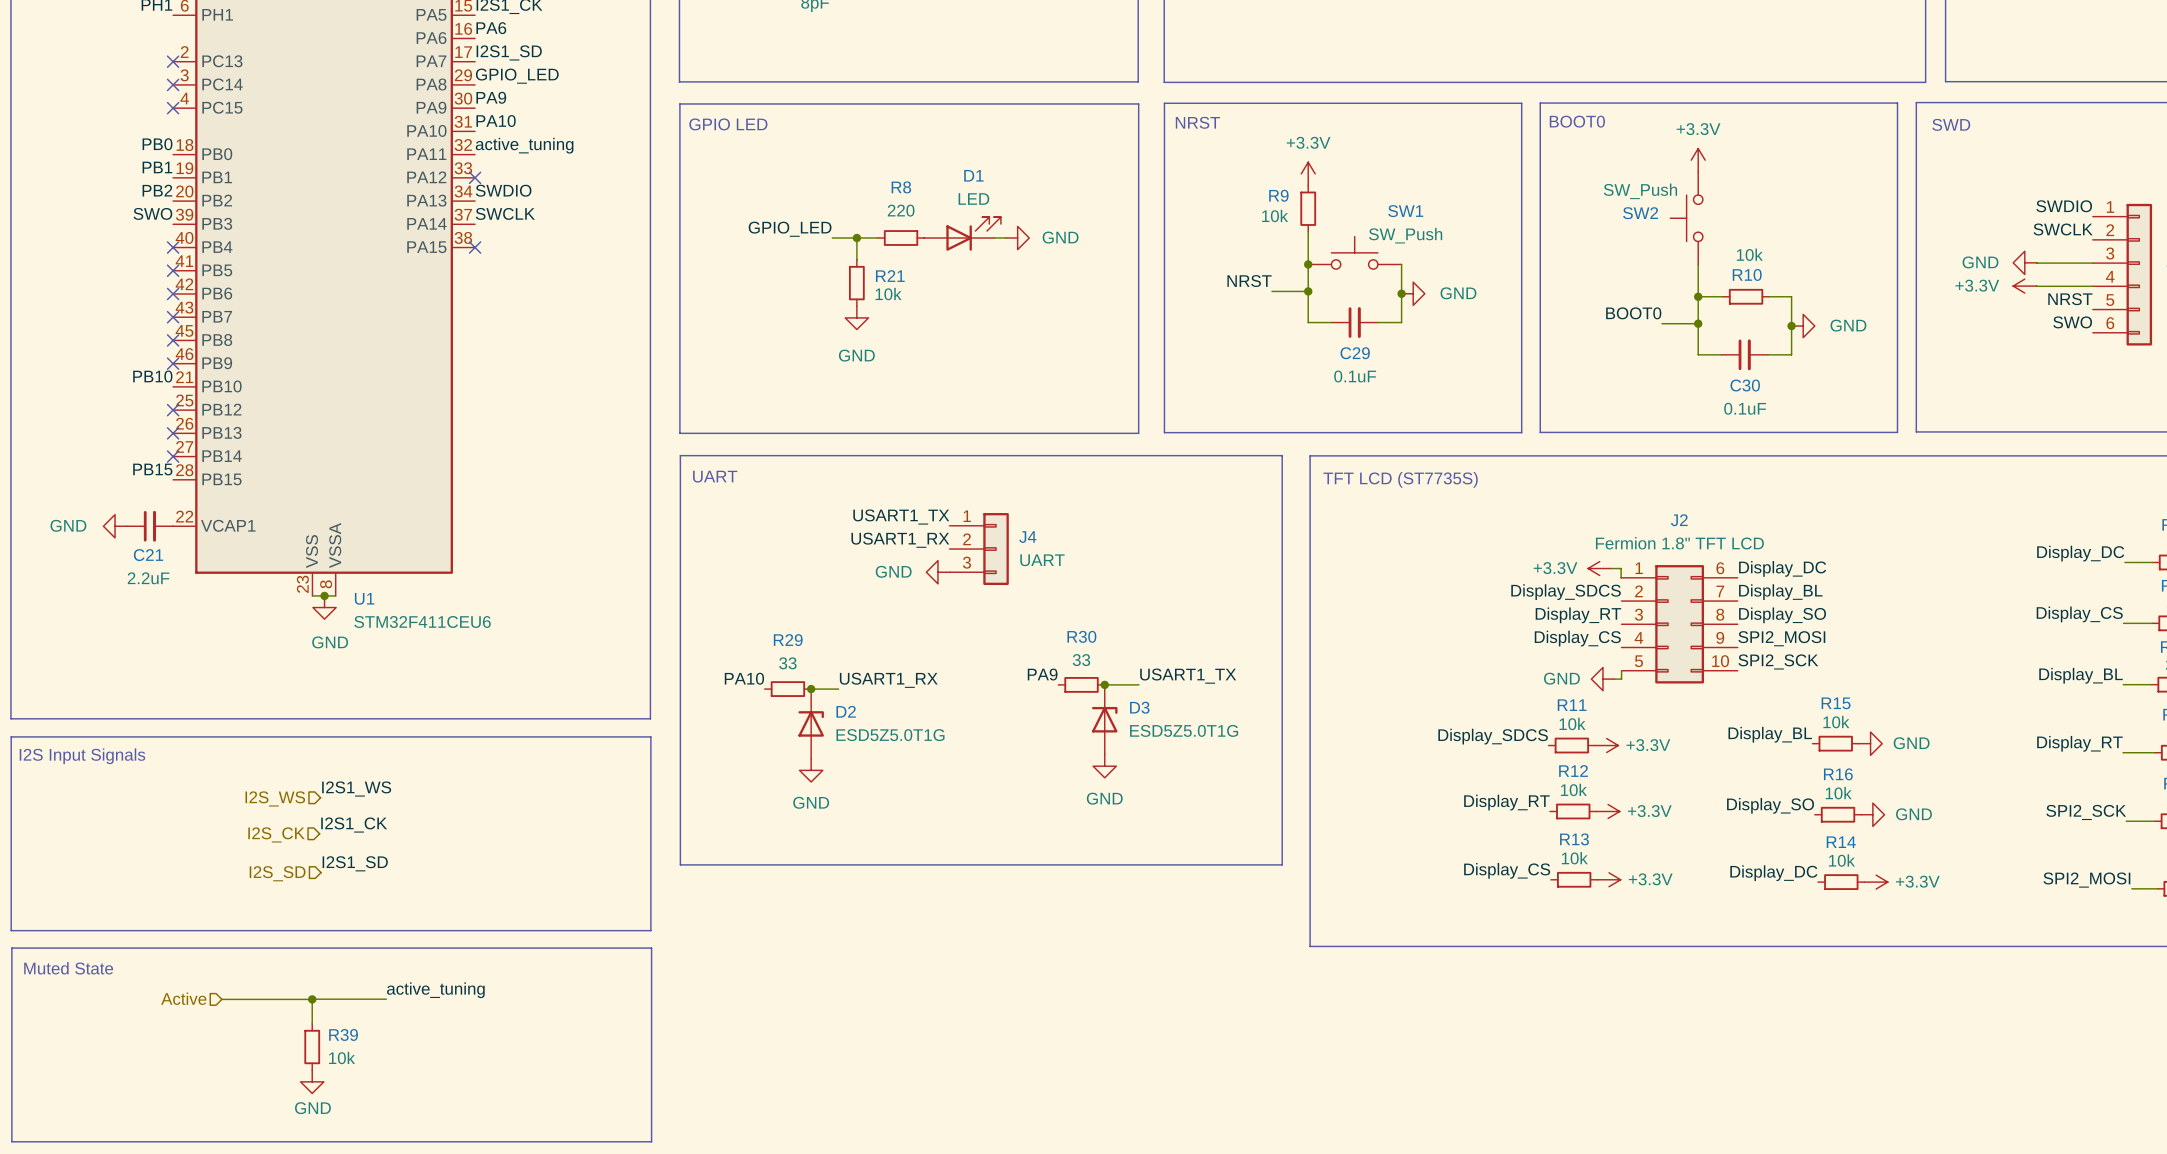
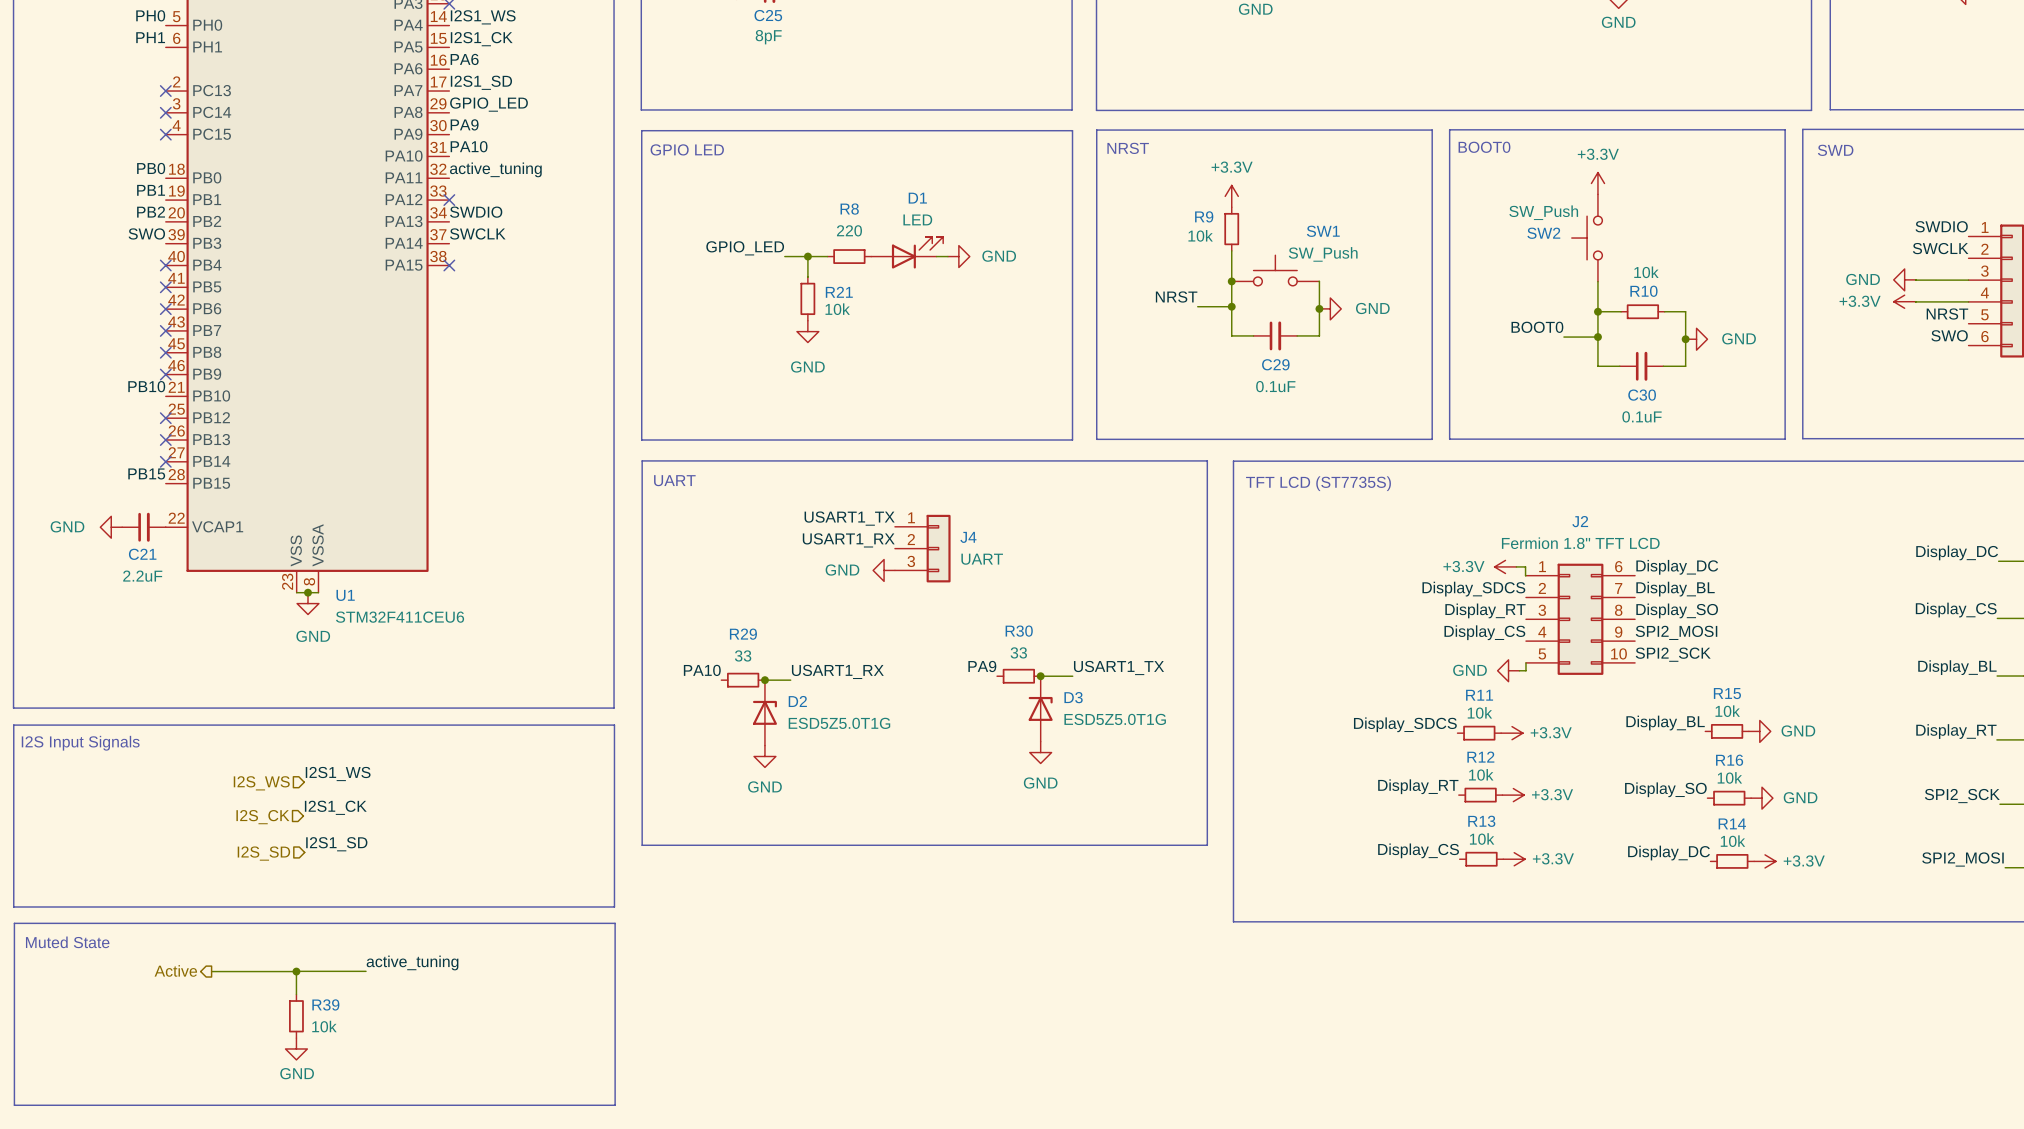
hierarchical label shape: input (183, 998) -> output (175, 970)

